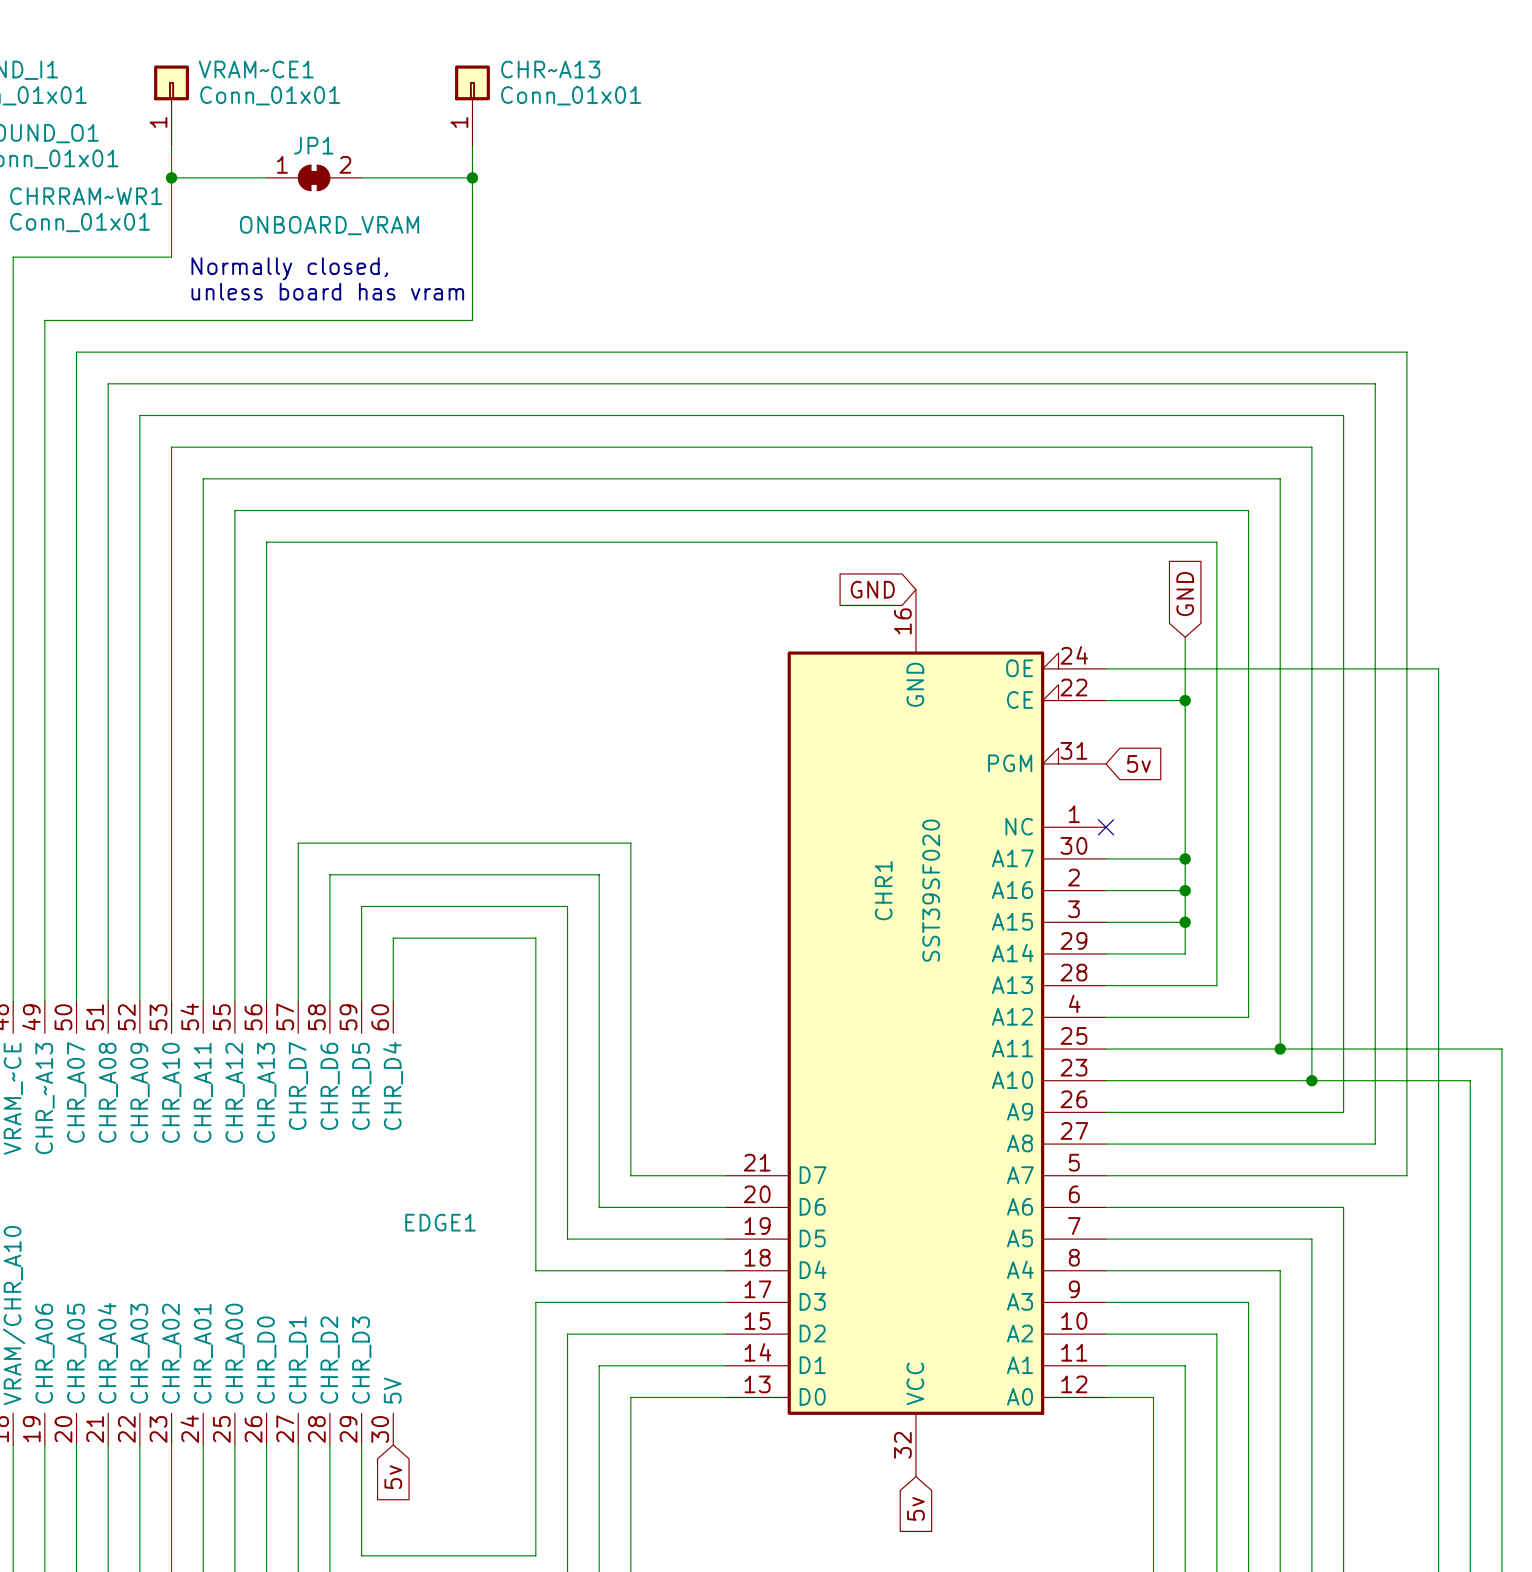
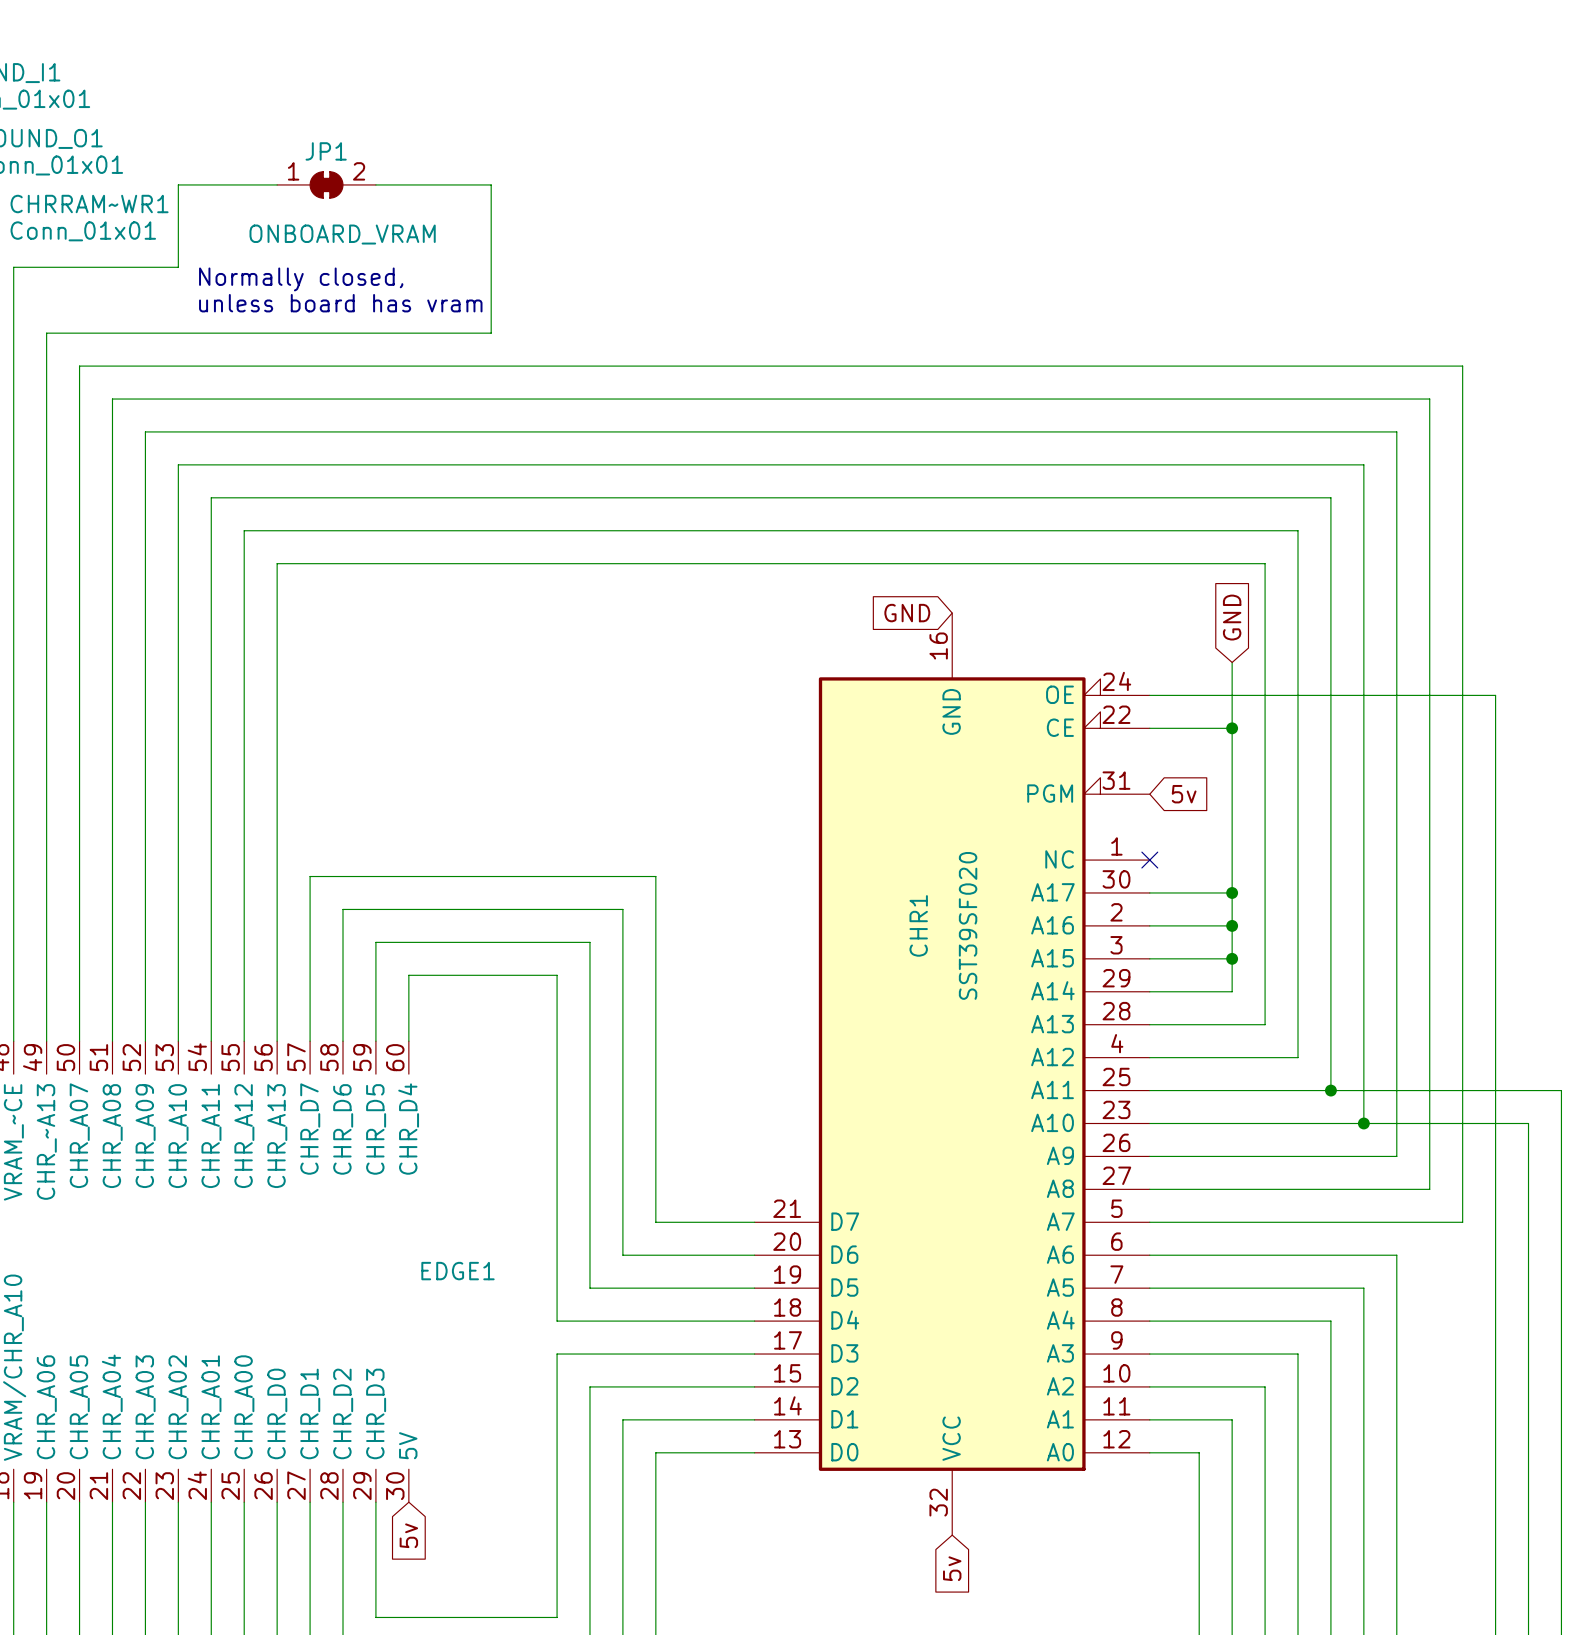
VRAM~CE1: Conn_01x01 (171, 105) -> none
CHR~A13: Conn_01x01 (472, 105) -> none
wire: (171, 146) (171, 177) -> none
wire: (472, 146) (472, 177) -> none
junction: (171, 177) -> none
junction: (472, 177) -> none

